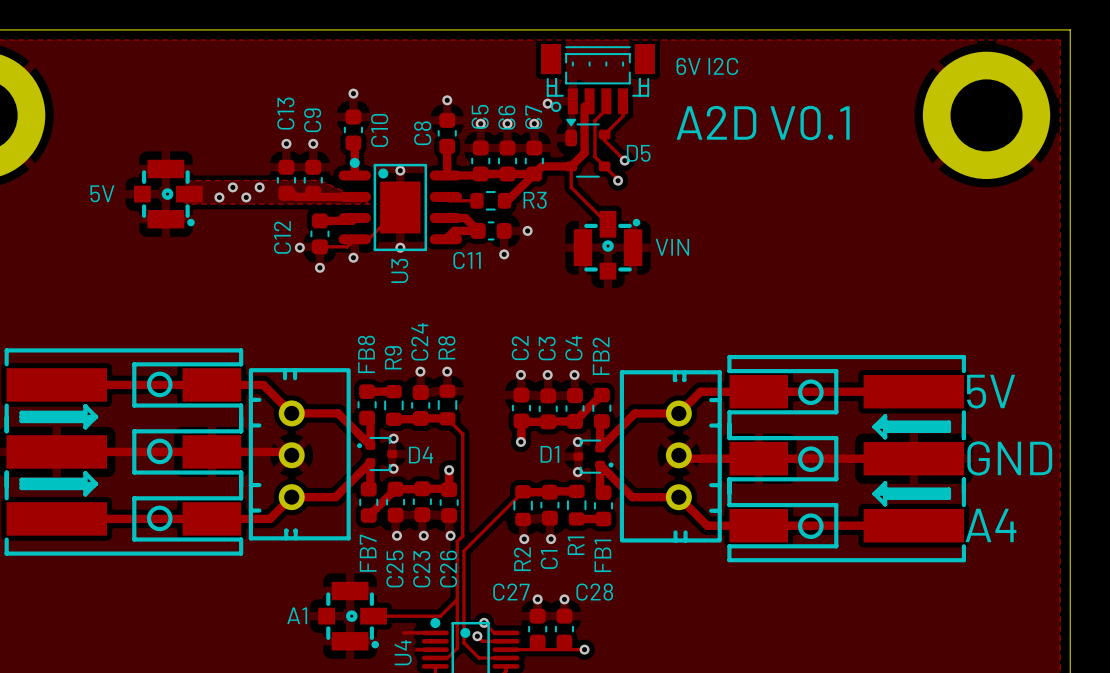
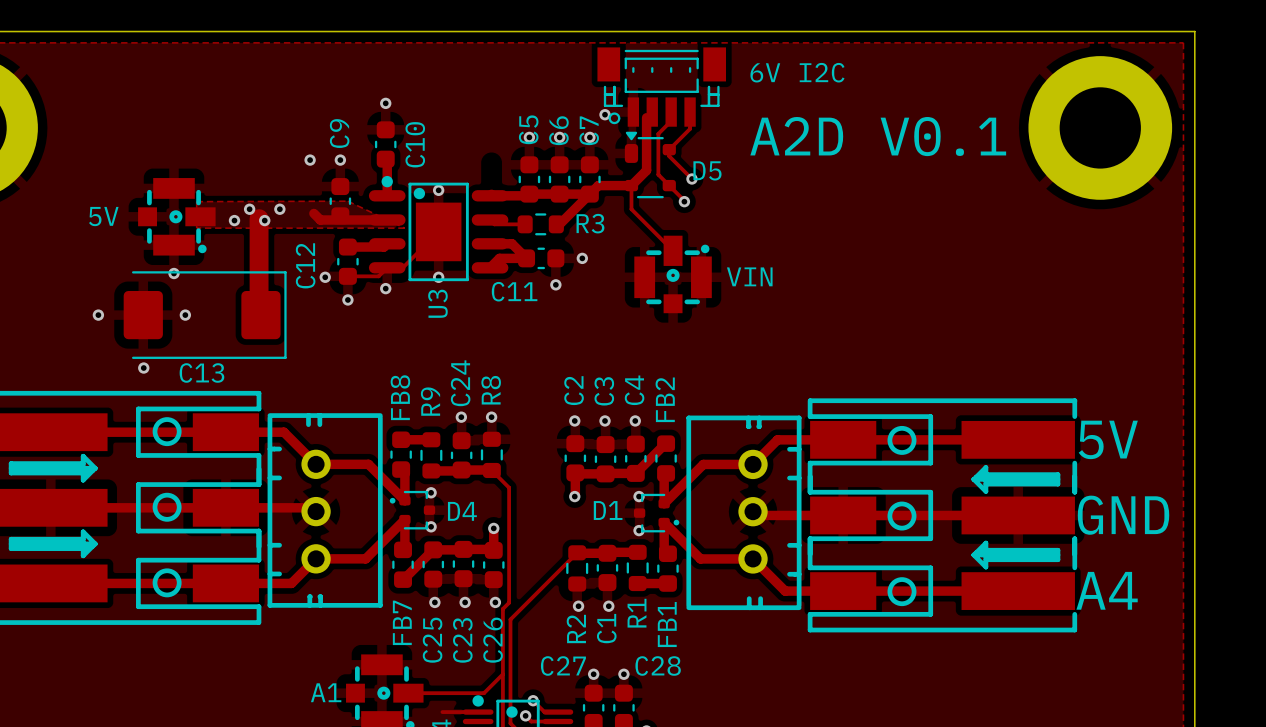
via: (447, 100) -> none
C13 name position: C13 (285, 113) -> C13 (201, 372)
C8: (447, 133) -> none
track: (447, 146) (447, 174) -> none
C13 footprint: [276, 159, 297, 201] -> [123, 271, 287, 359]
track: none -> (249, 209) (259, 218) (259, 313)
via: none -> (174, 273)
via: none -> (98, 315)
via: none -> (185, 315)
via: none -> (143, 368)

